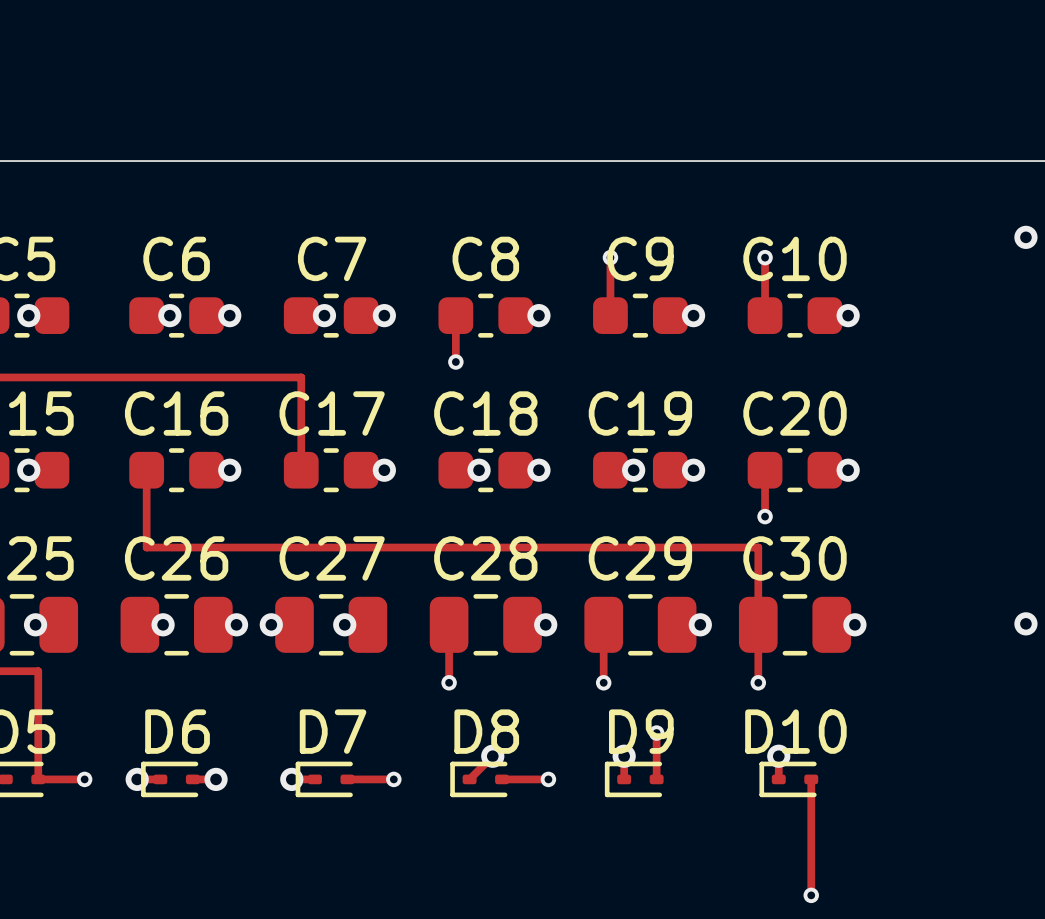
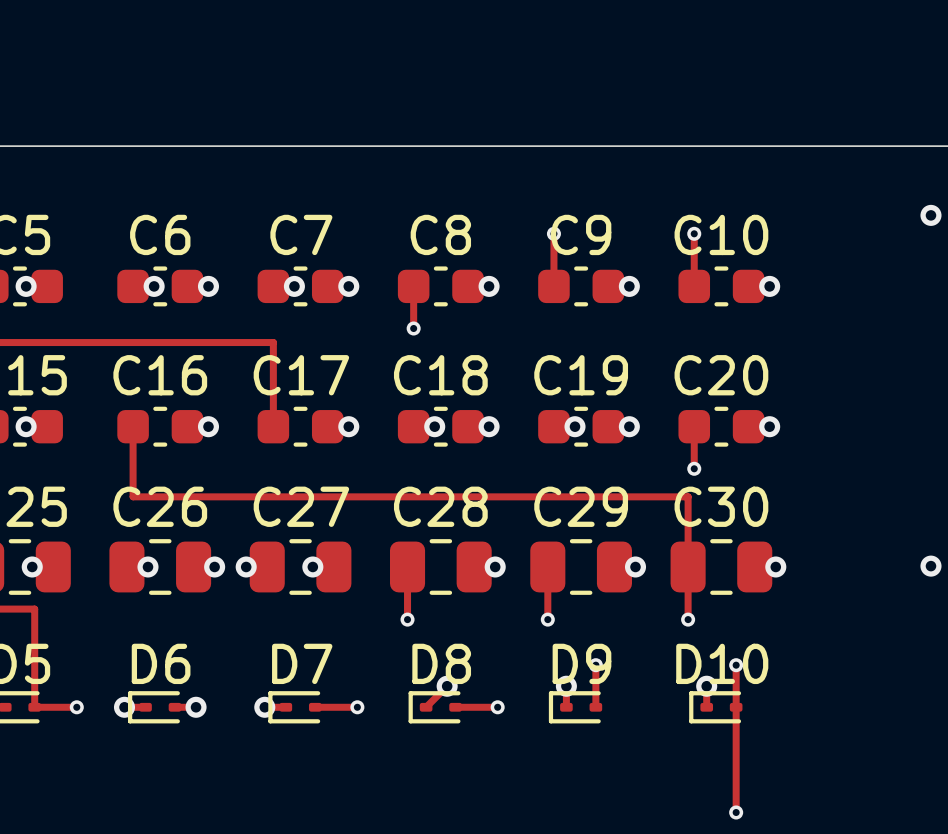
track: none -> (736, 665) (736, 707)
via: none -> (736, 665)

